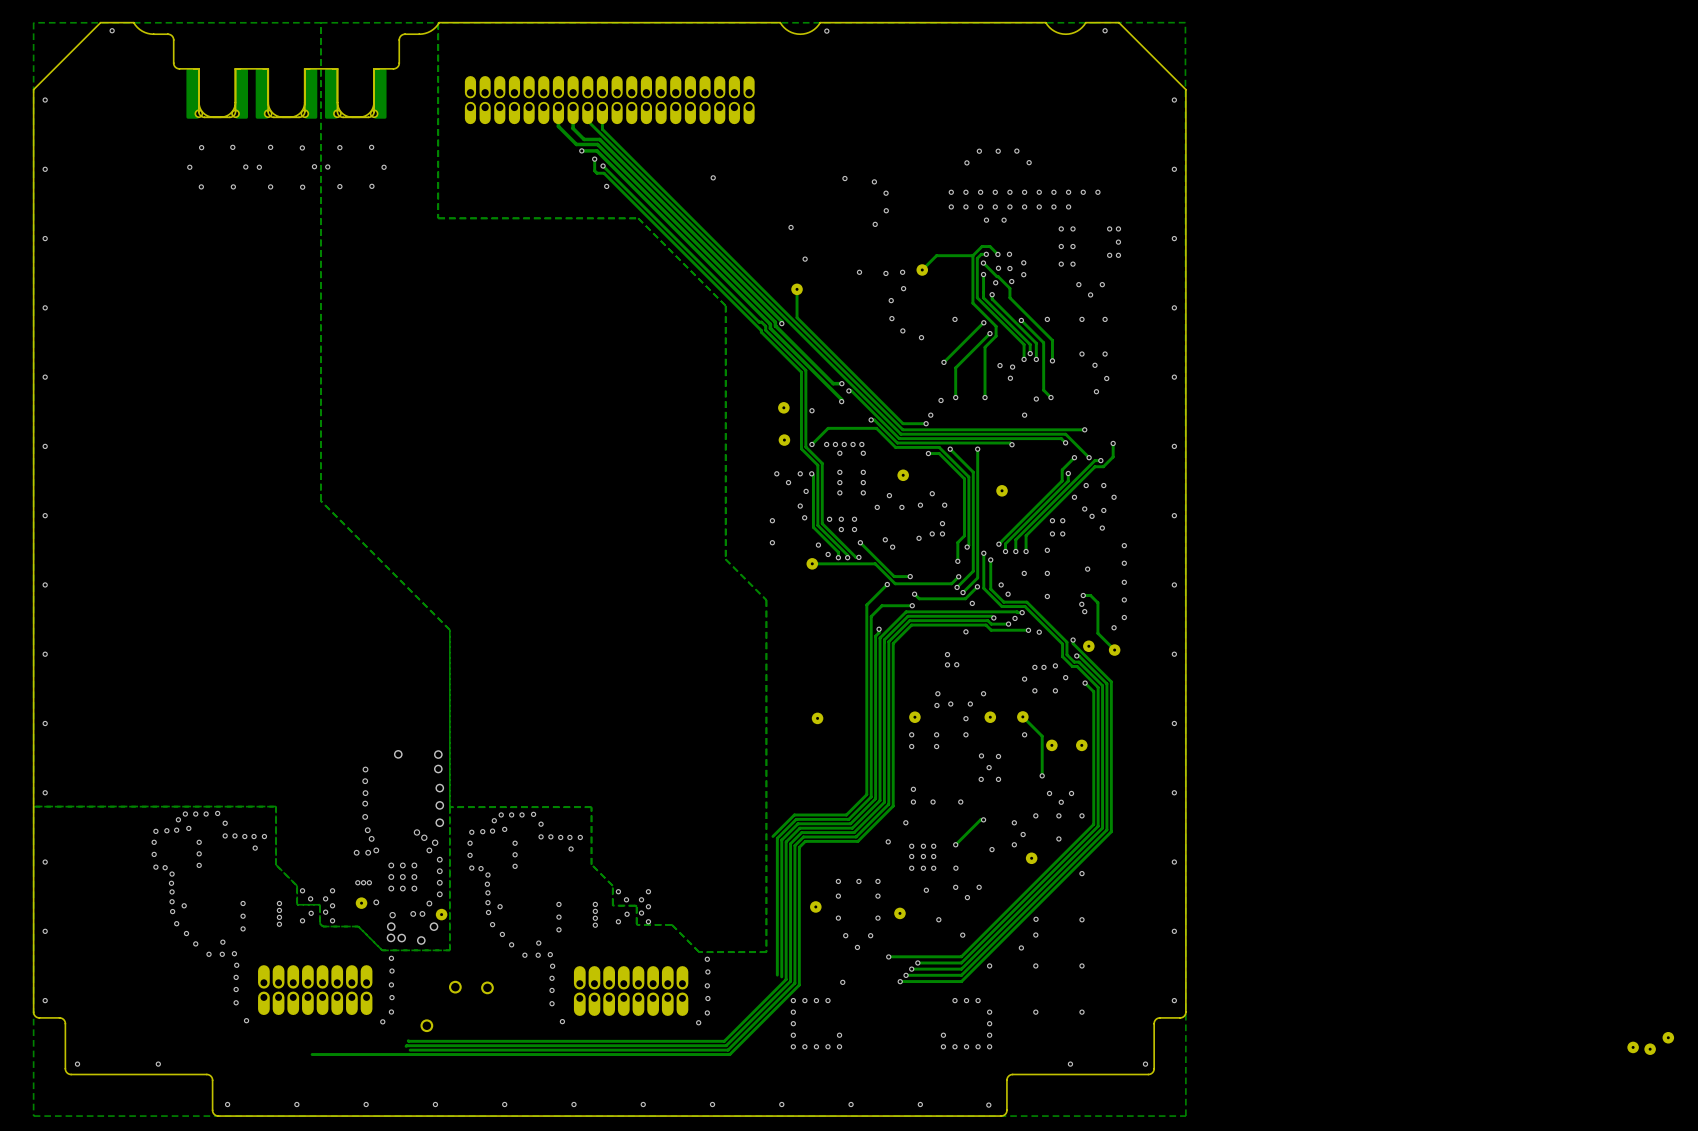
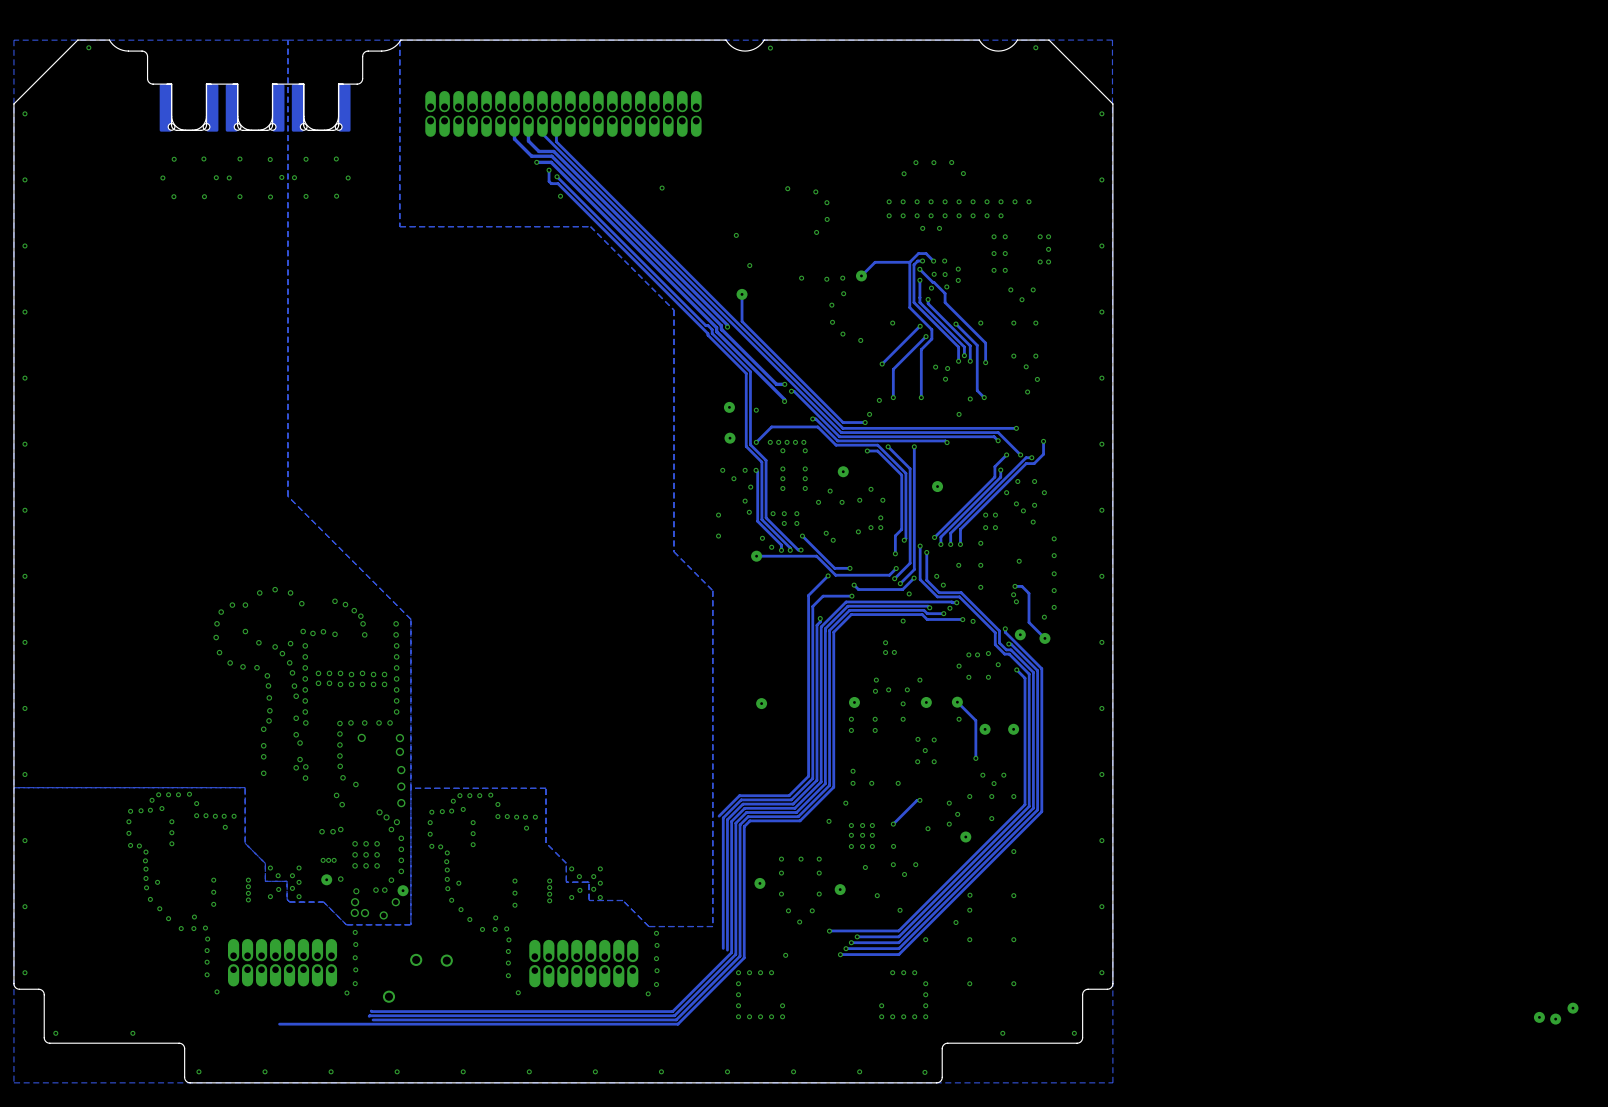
via: none -> (275, 589)
via: none -> (259, 592)
via: none -> (290, 592)
via: none -> (334, 601)
via: none -> (301, 603)
via: none -> (345, 604)
via: none -> (232, 605)
via: none -> (245, 605)
via: none -> (354, 610)
via: none -> (221, 612)
via: none -> (360, 616)
via: none -> (217, 623)
via: none -> (363, 623)
via: none -> (396, 623)
via: none -> (245, 631)
via: none -> (303, 631)
via: none -> (323, 631)
via: none -> (312, 633)
via: none -> (334, 634)
via: none -> (364, 634)
via: none -> (396, 634)
via: none -> (216, 637)
via: none -> (258, 642)
via: none -> (290, 643)
via: none -> (305, 645)
via: none -> (396, 645)
via: none -> (275, 646)
via: none -> (219, 652)
via: none -> (282, 653)
via: none -> (305, 656)
via: none -> (396, 656)
via: none -> (230, 662)
via: none -> (289, 662)
via: none -> (243, 666)
via: none -> (257, 667)
via: none -> (305, 667)
via: none -> (396, 667)
via: none -> (292, 672)
via: none -> (318, 673)
via: none -> (329, 673)
via: none -> (340, 673)
via: none -> (362, 673)
via: none -> (351, 674)
via: none -> (373, 674)
via: none -> (384, 674)
via: none -> (267, 675)
via: none -> (305, 678)
via: none -> (396, 678)
via: none -> (318, 683)
via: none -> (329, 683)
via: none -> (340, 684)
via: none -> (351, 684)
via: none -> (362, 684)
via: none -> (373, 684)
via: none -> (384, 684)
via: none -> (268, 685)
via: none -> (294, 686)
via: none -> (305, 689)
via: none -> (396, 689)
via: none -> (296, 696)
via: none -> (269, 697)
via: none -> (305, 700)
via: none -> (396, 700)
via: none -> (269, 710)
via: none -> (305, 711)
via: none -> (396, 711)
via: none -> (296, 718)
via: none -> (269, 720)
via: none -> (305, 722)
via: none -> (350, 722)
via: none -> (364, 722)
via: none -> (379, 722)
via: none -> (390, 722)
via: none -> (339, 723)
via: none -> (263, 729)
via: none -> (339, 733)
via: none -> (296, 734)
via: none -> (300, 743)
via: none -> (339, 744)
via: none -> (263, 745)
via: (365, 769) -> none
via: none -> (339, 755)
via: none -> (263, 756)
via: none -> (300, 759)
via: (365, 781) -> none
via: none -> (305, 766)
via: none -> (340, 766)
via: none -> (296, 767)
via: none -> (263, 773)
via: (365, 793) -> none
via: none -> (305, 778)
via: none -> (343, 777)
via: (365, 803) -> none
via: none -> (355, 784)
via: none -> (336, 795)
via: (365, 816) -> none
via: none -> (342, 804)
via: (367, 830) -> none
via: (371, 838) -> none

